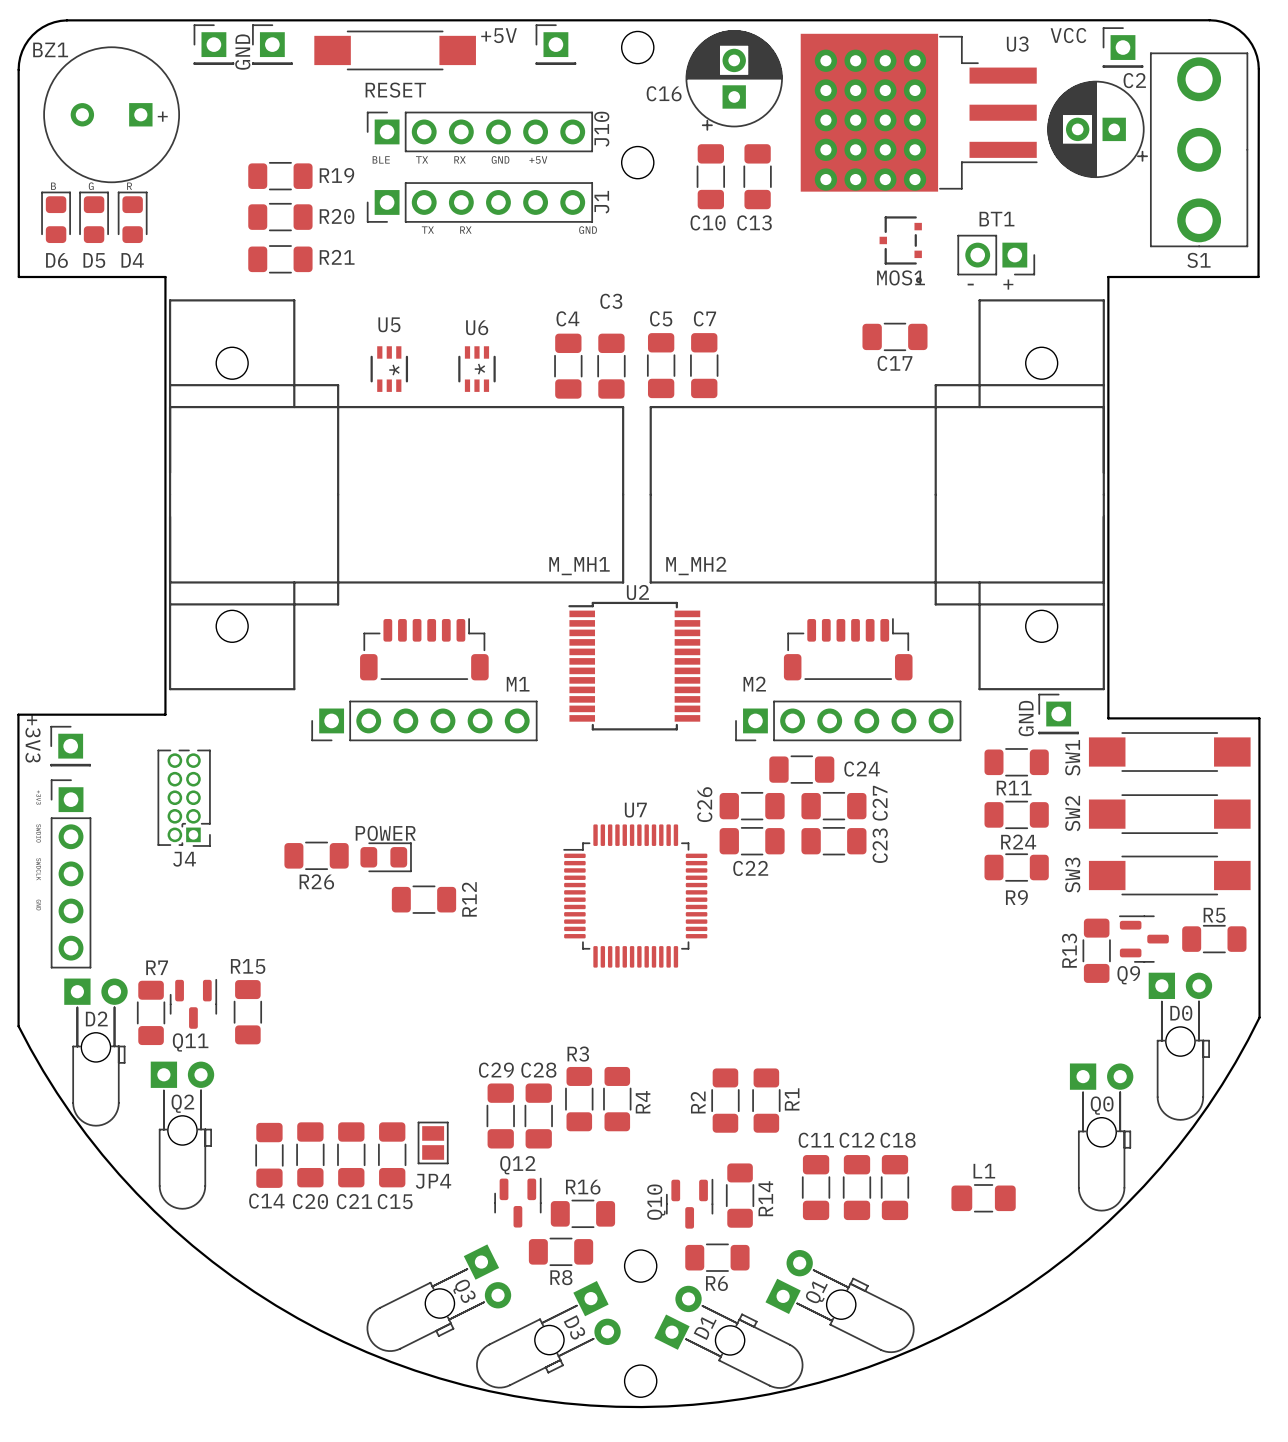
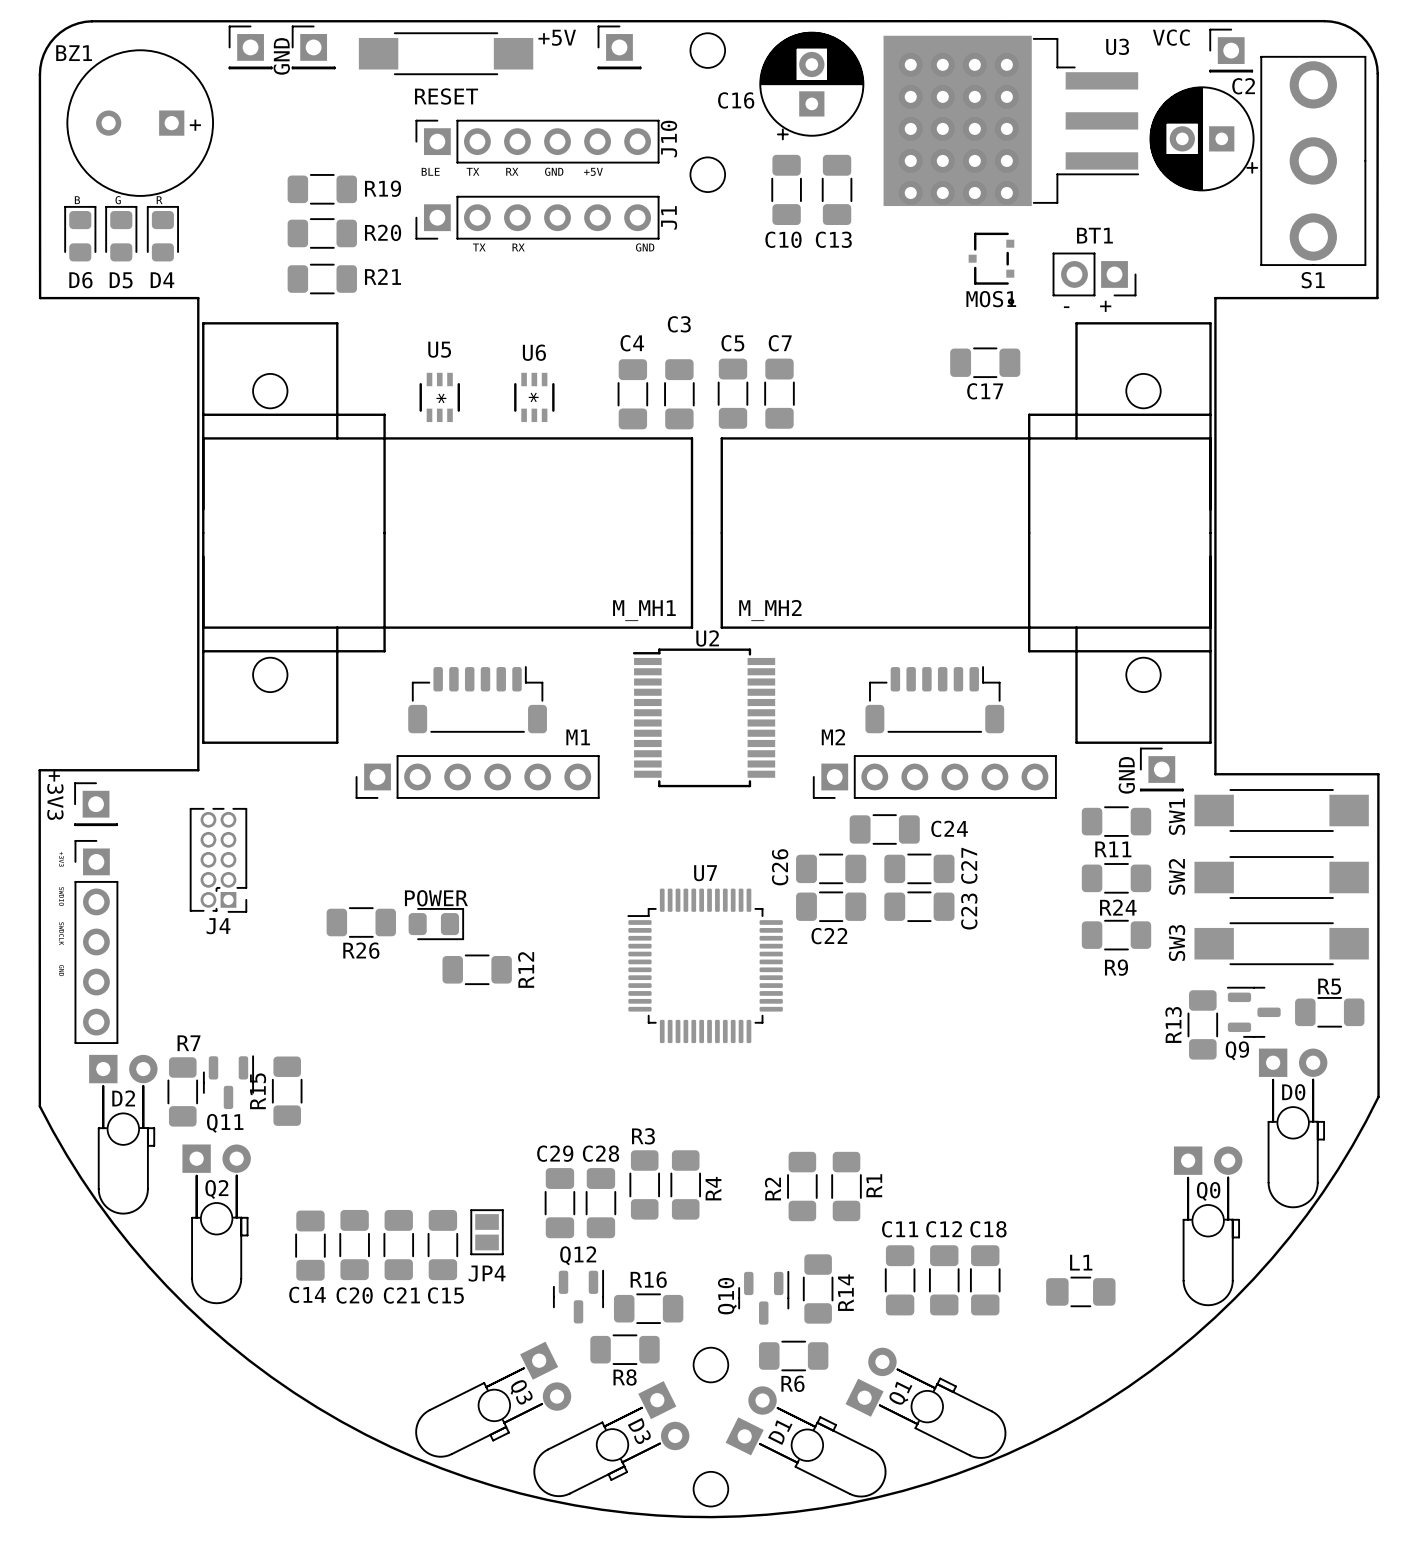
R15 name rotation: 0° (248, 966) -> 90° counterclockwise (258, 1091)
R15 name position: R15 (248, 966) -> R15 (258, 1091)

